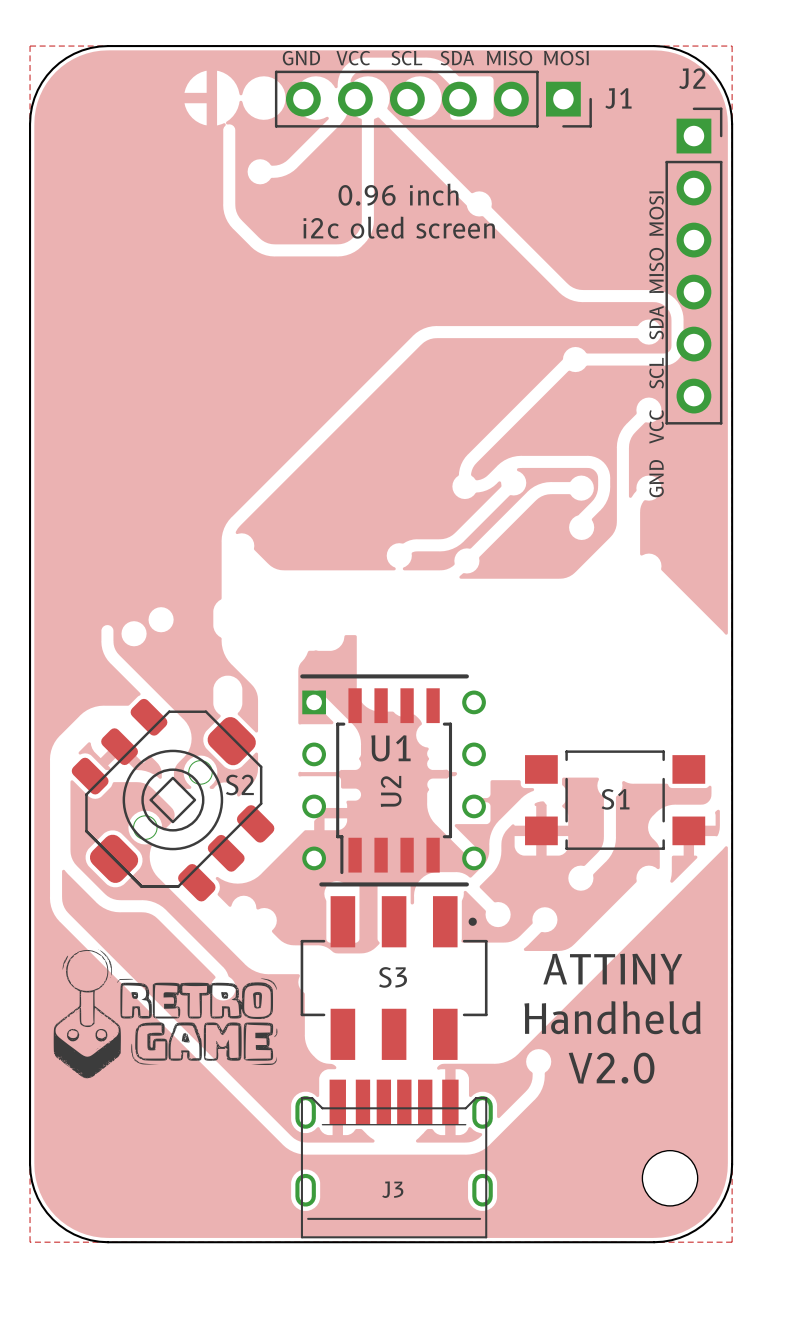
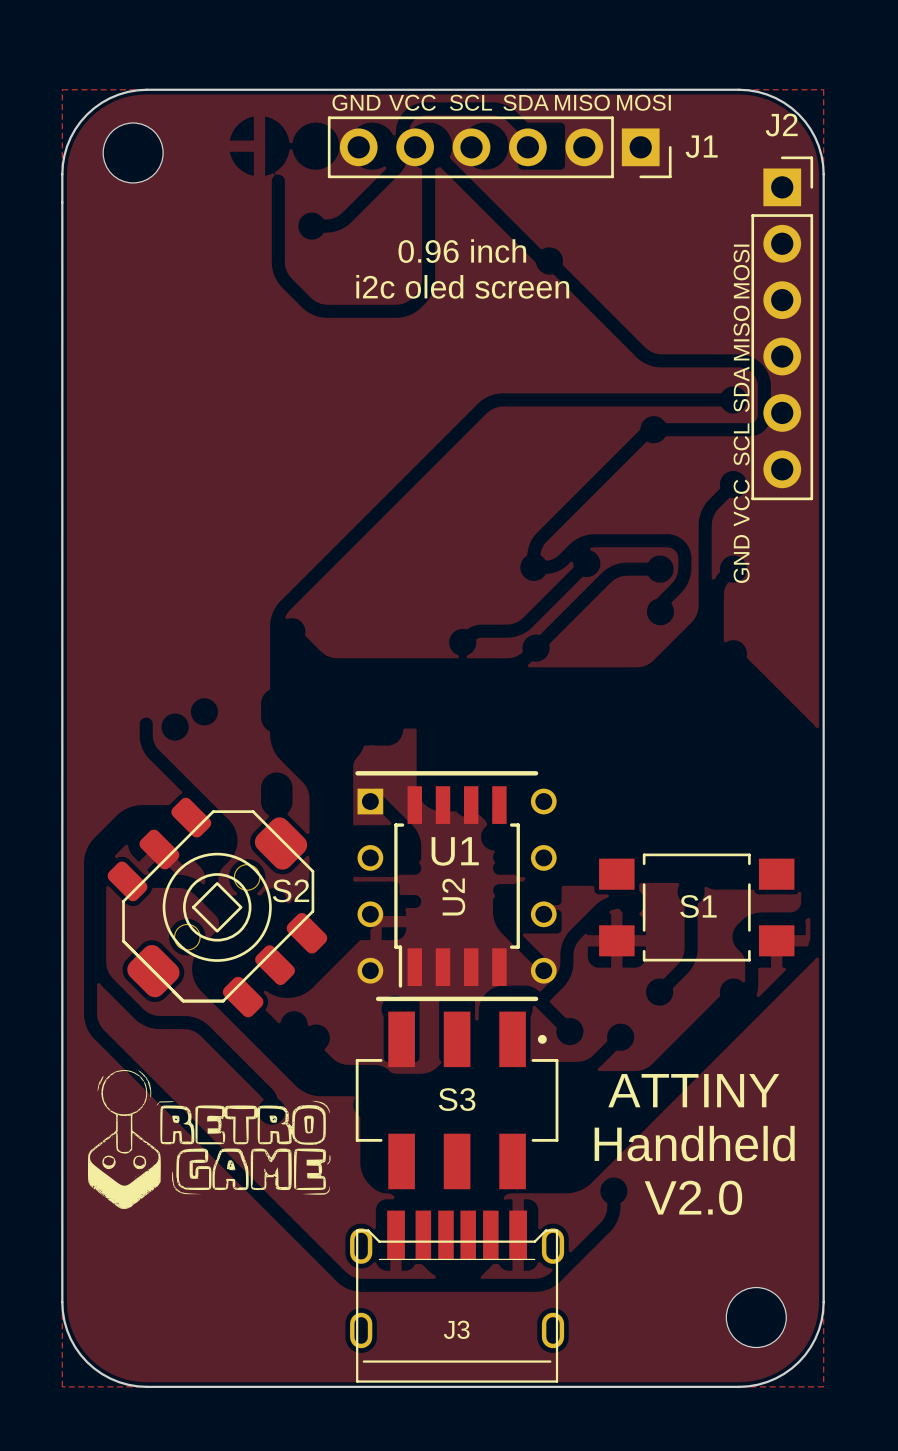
part: none -> (133, 152)

